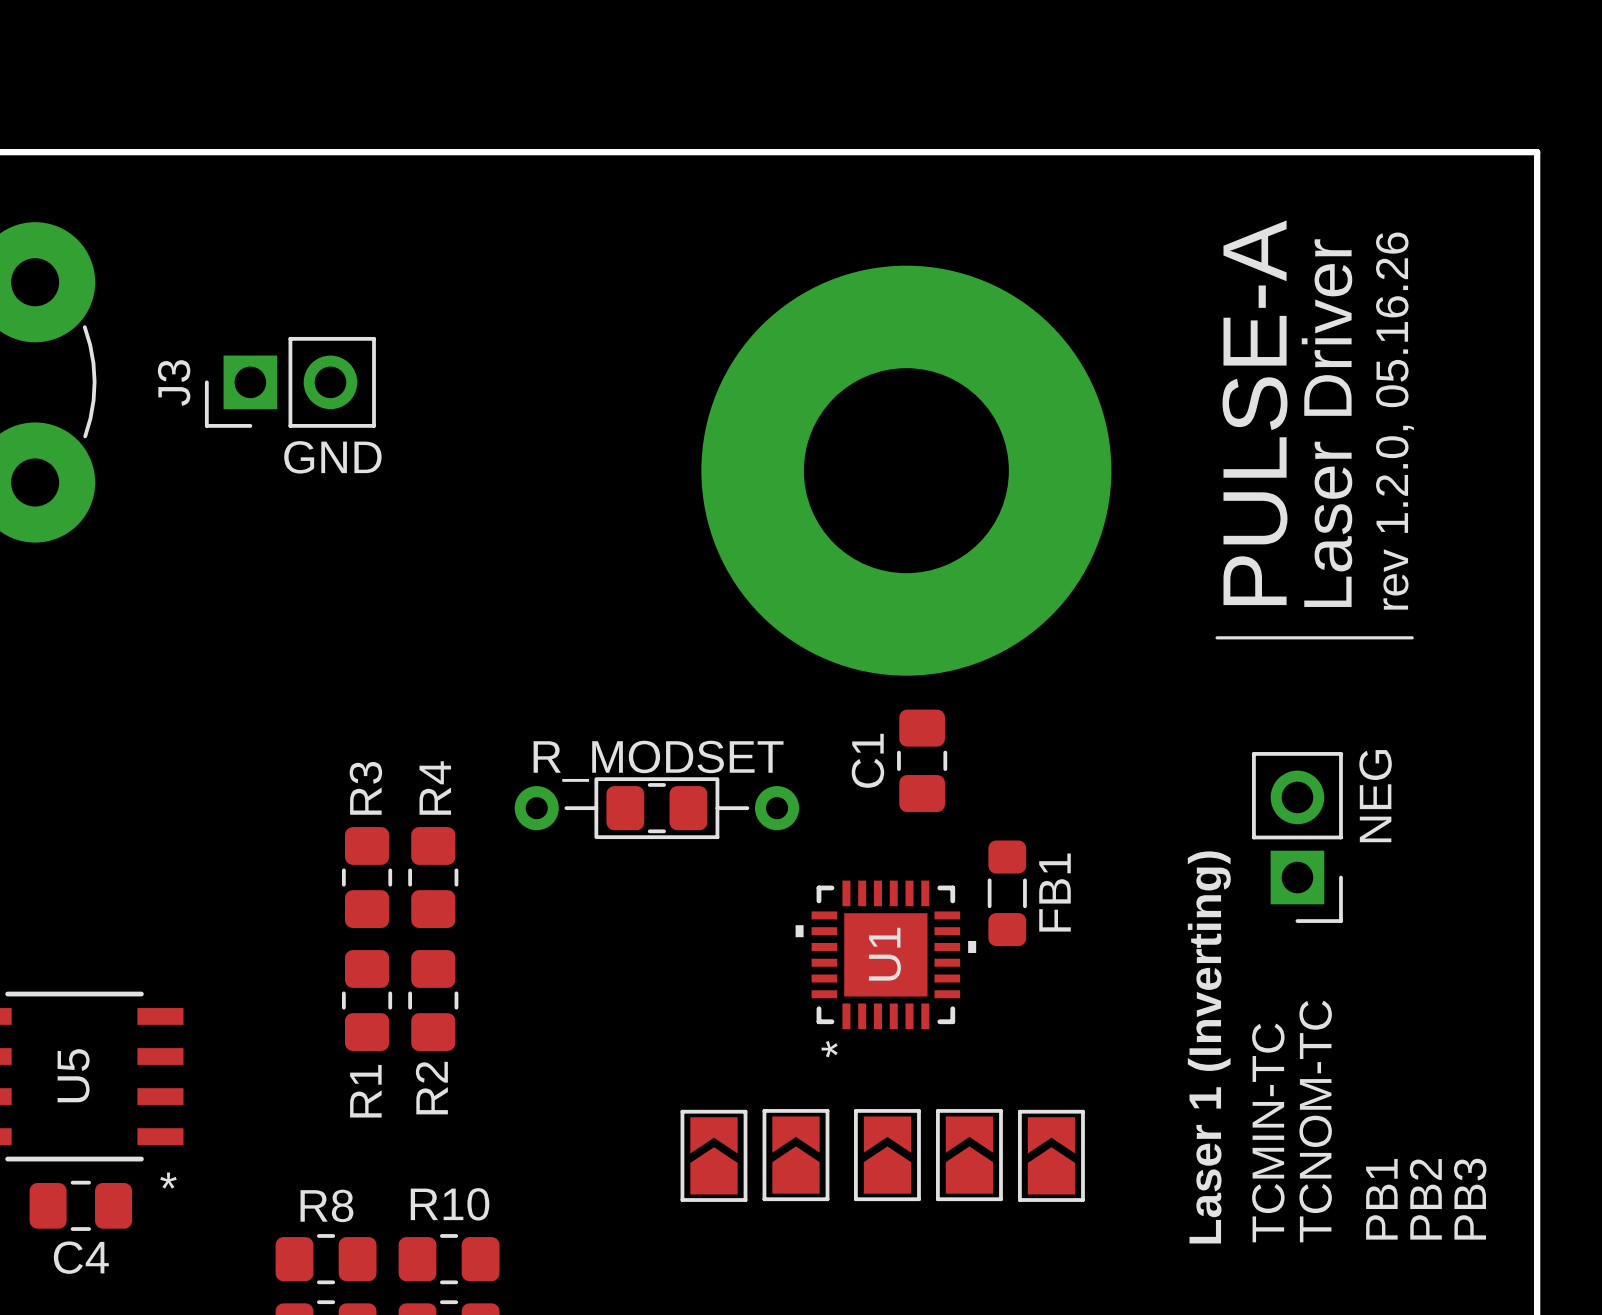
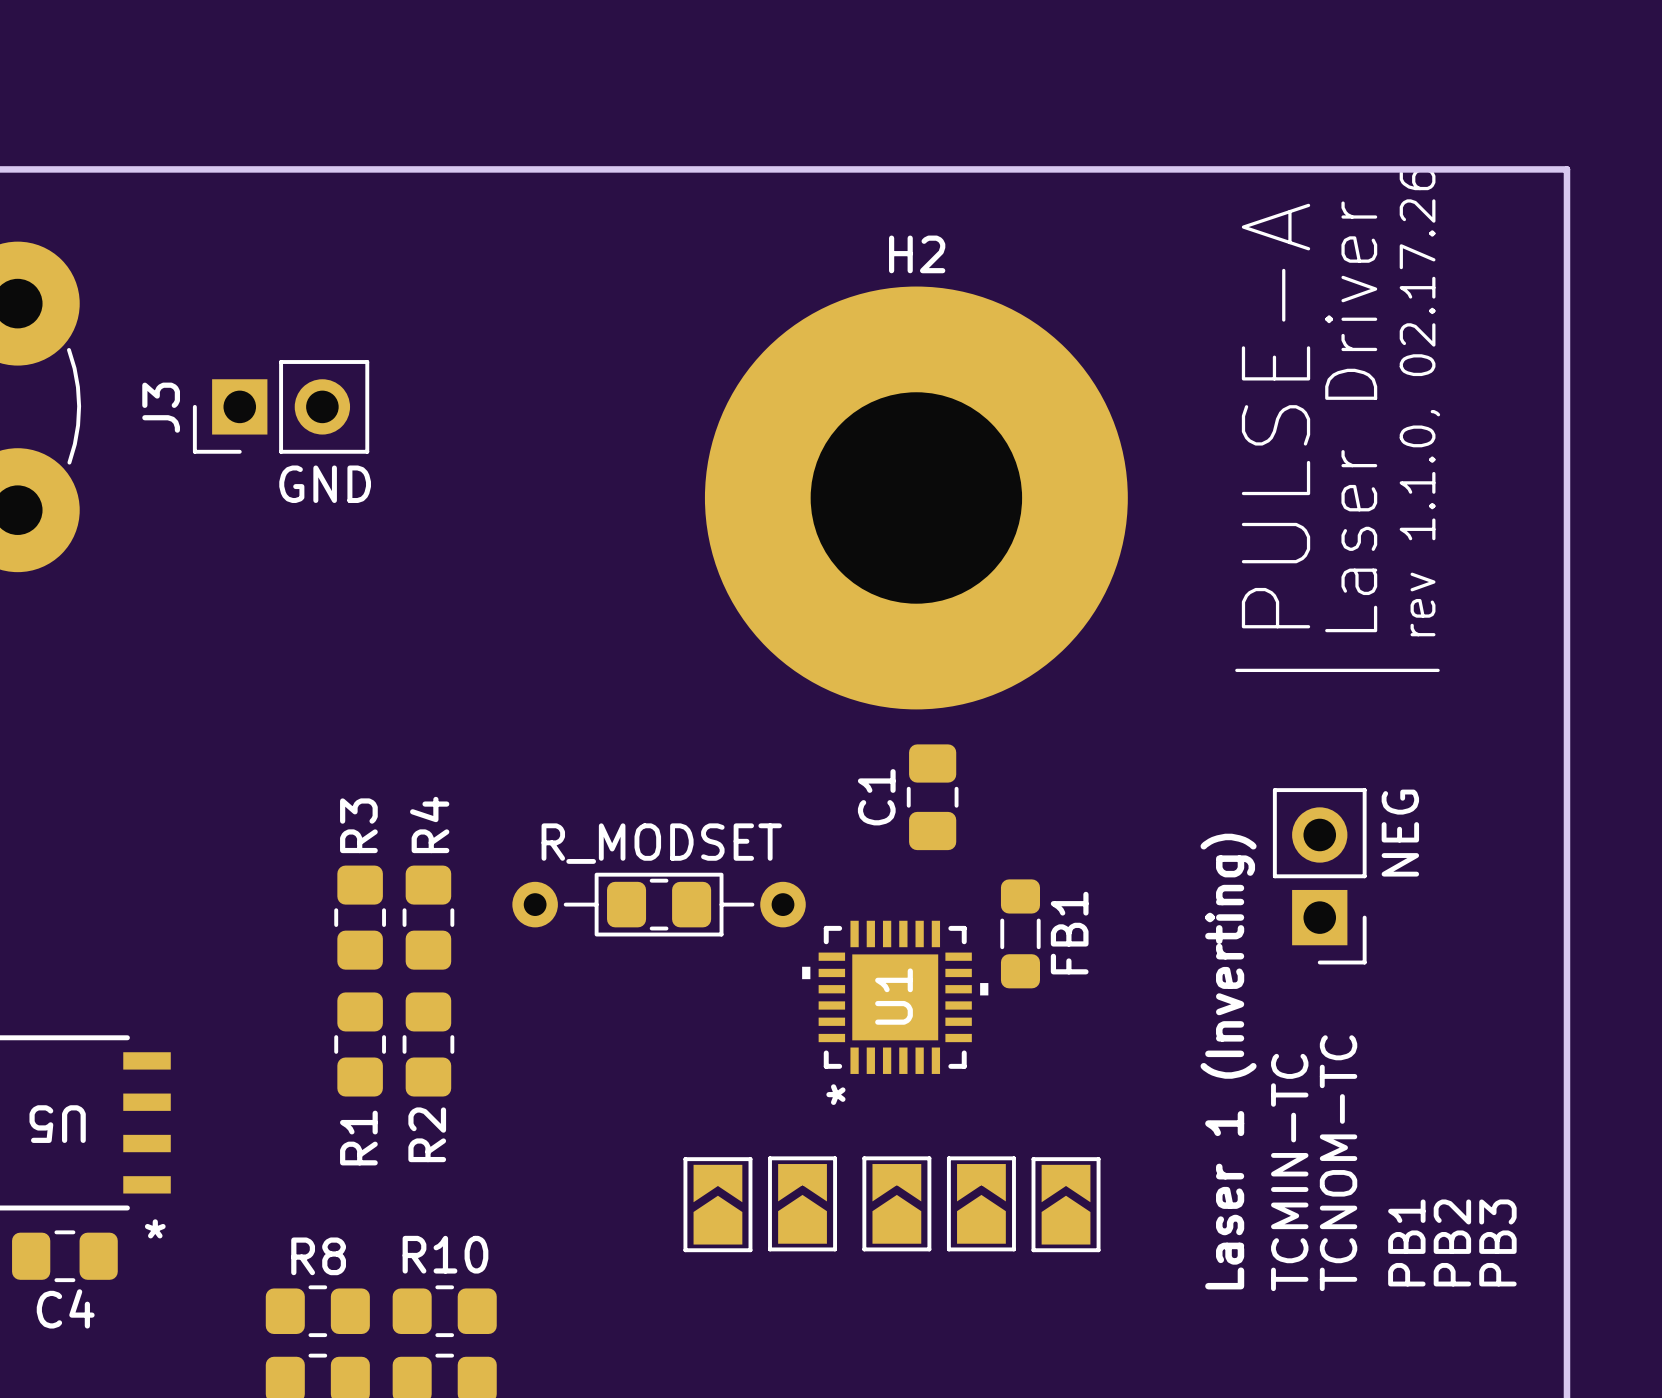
H2 name: none -> H2 (917, 254)
text: rev 1.2.0, 05.16.26 (1394, 421) -> rev 1.1.0, 02.17.26 (1419, 402)
text position: R_MODSET (658, 761) -> R_MODSET (661, 843)
part position: (656, 808) -> (659, 904)
part position: (656, 808) -> (659, 904)
U5 name rotation: 0° (73, 1075) -> 90° counterclockwise (57, 1124)

